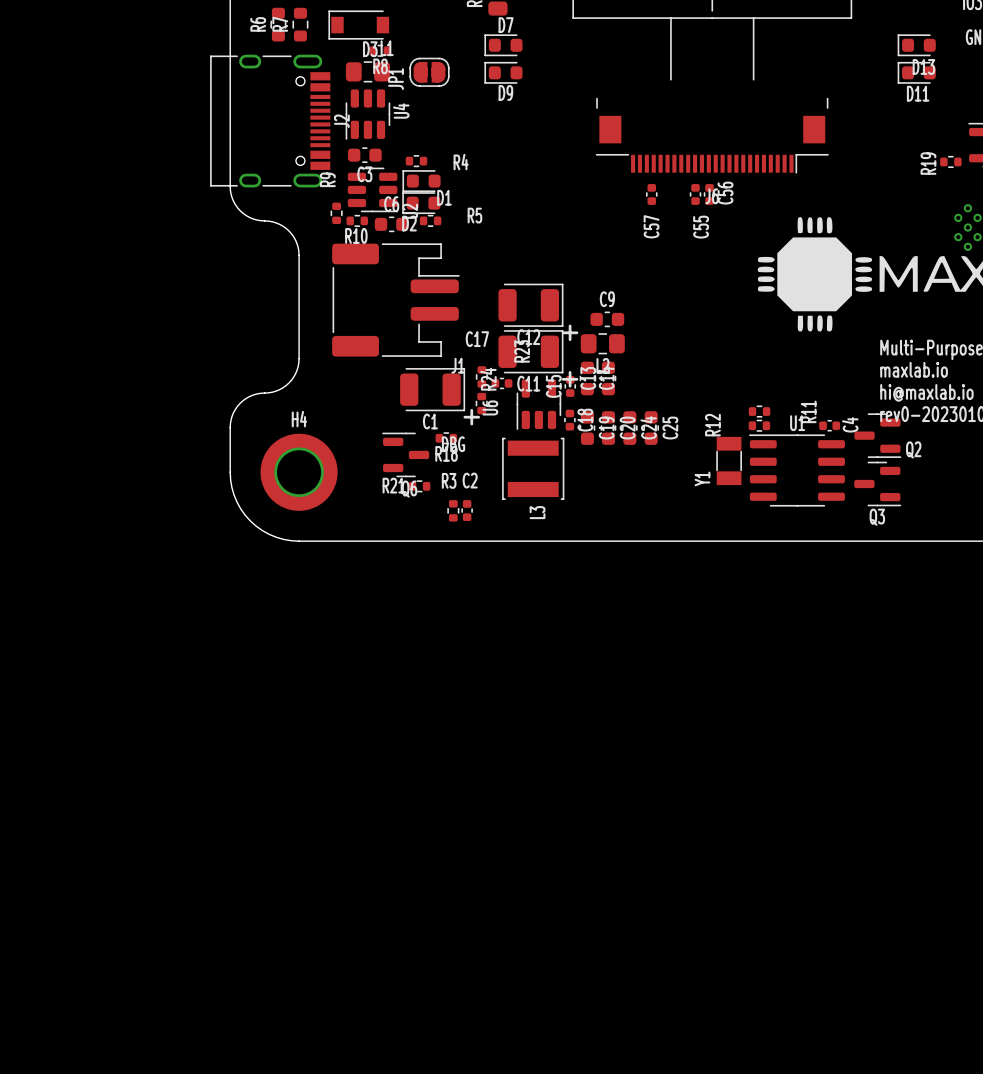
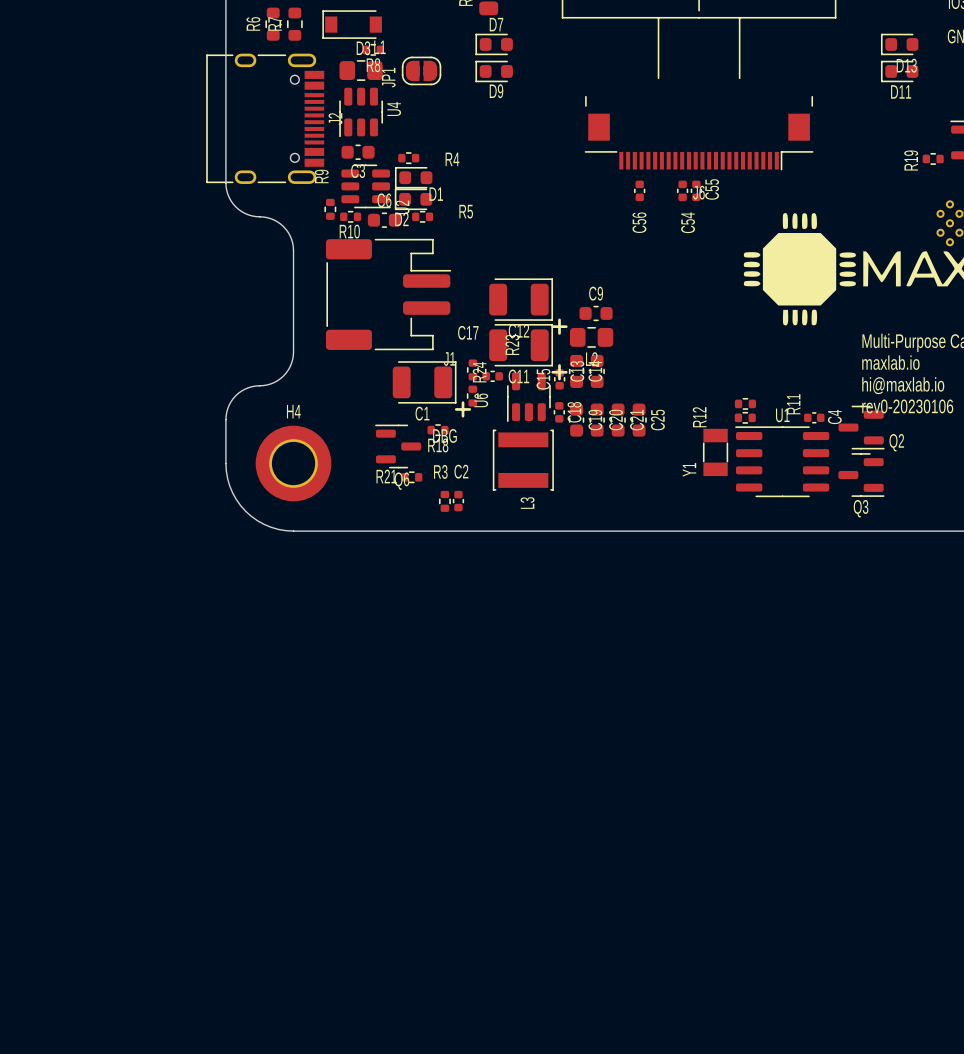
C56 name: C56 (725, 193) -> C55 (712, 189)
C57 name: C57 (651, 226) -> C56 (639, 222)
C55 name: C55 (701, 227) -> C54 (688, 222)
C24 name: C24 (648, 427) -> C21 (636, 420)

